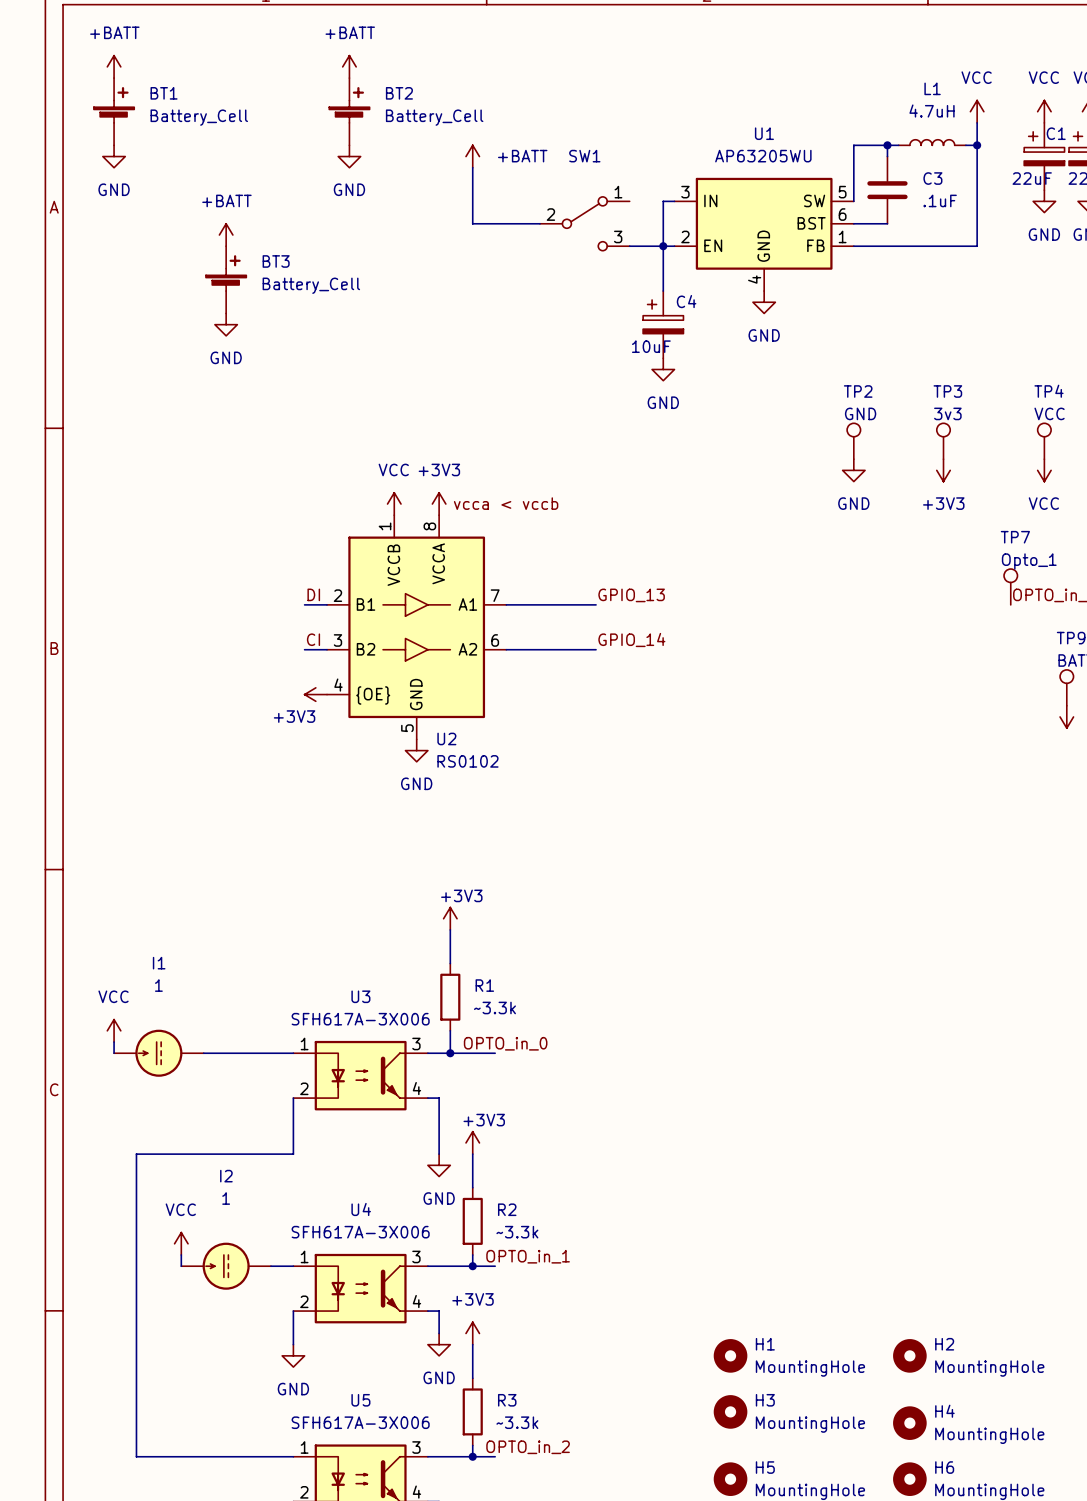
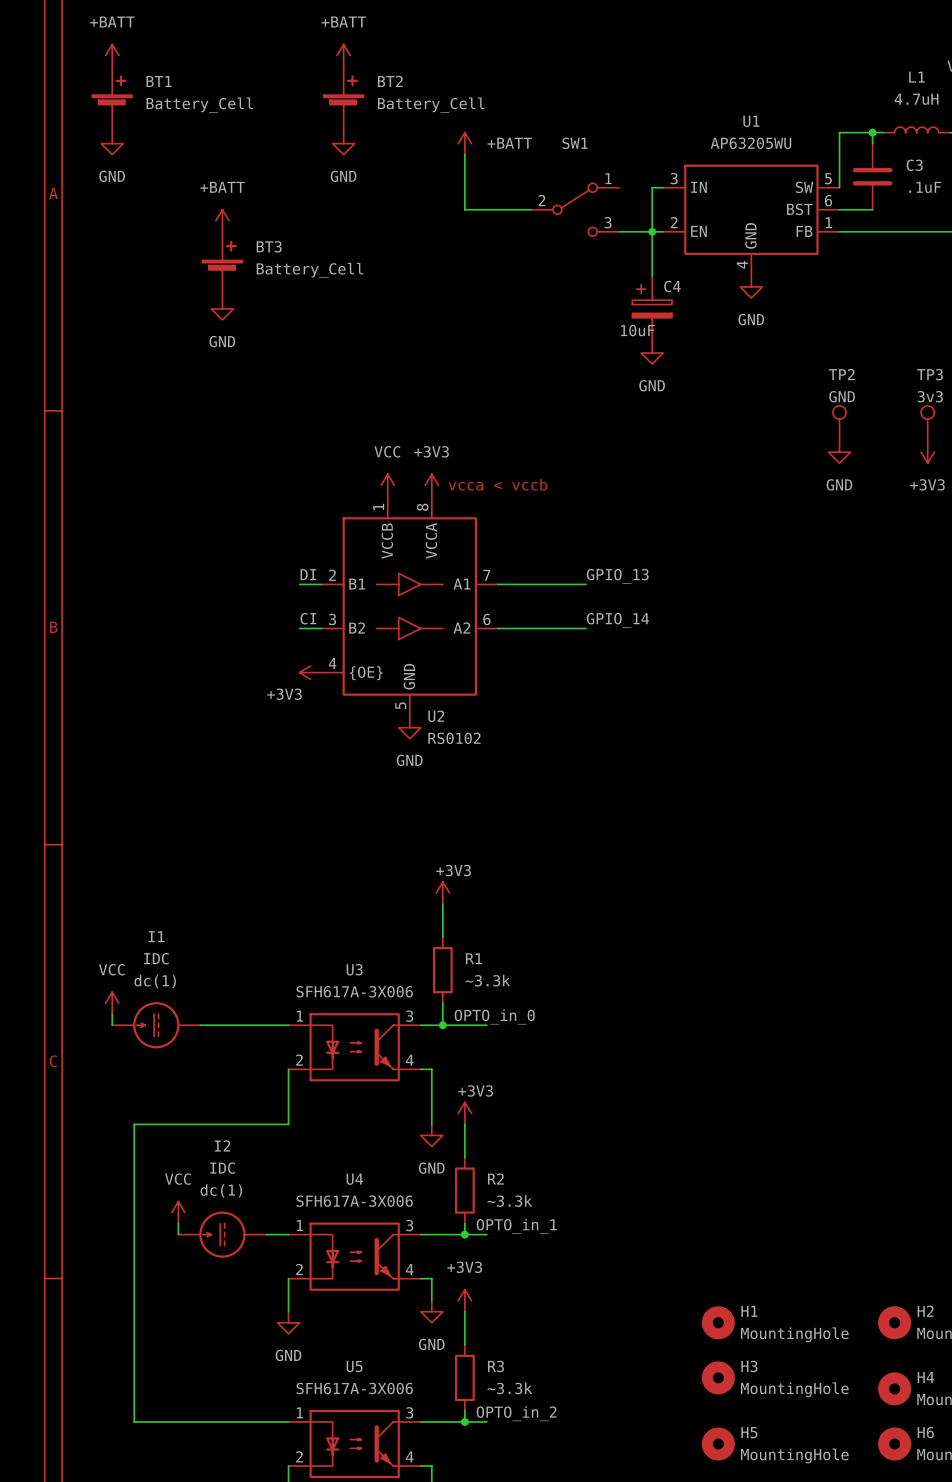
I1 value: 1 (158, 985) -> IDC (156, 958)
I1 text: none -> dc(1) (155, 981)
I2 value: 1 (226, 1198) -> IDC (222, 1168)
I2 text: none -> dc(1) (221, 1190)

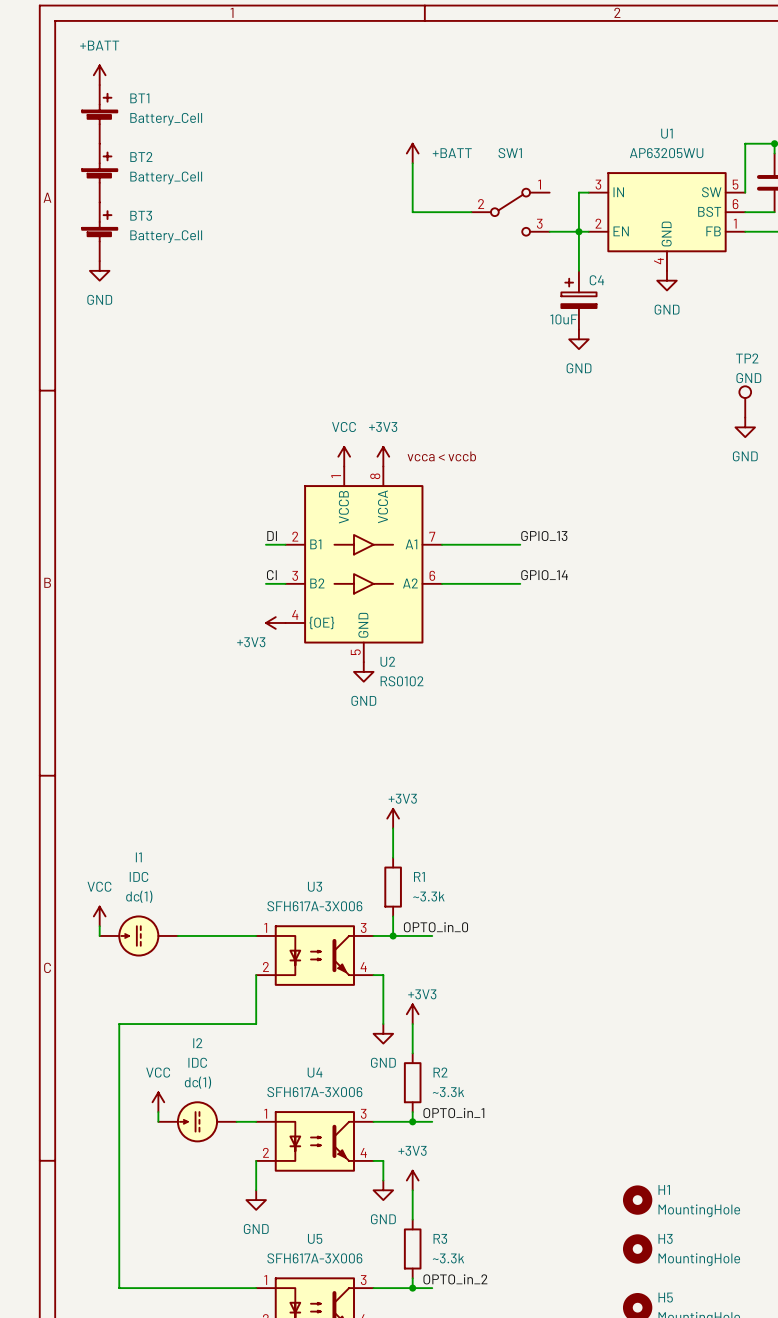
power symbol: +BATT (343, 55) -> none
BT2 position: (343, 99) -> (99, 173)
power symbol: GND (112, 143) -> none
power symbol: GND (343, 143) -> none
power symbol: +BATT (222, 220) -> none
BT3 position: (222, 264) -> (99, 231)
power symbol: none -> GND (99, 270)
power symbol: GND (222, 308) -> none

